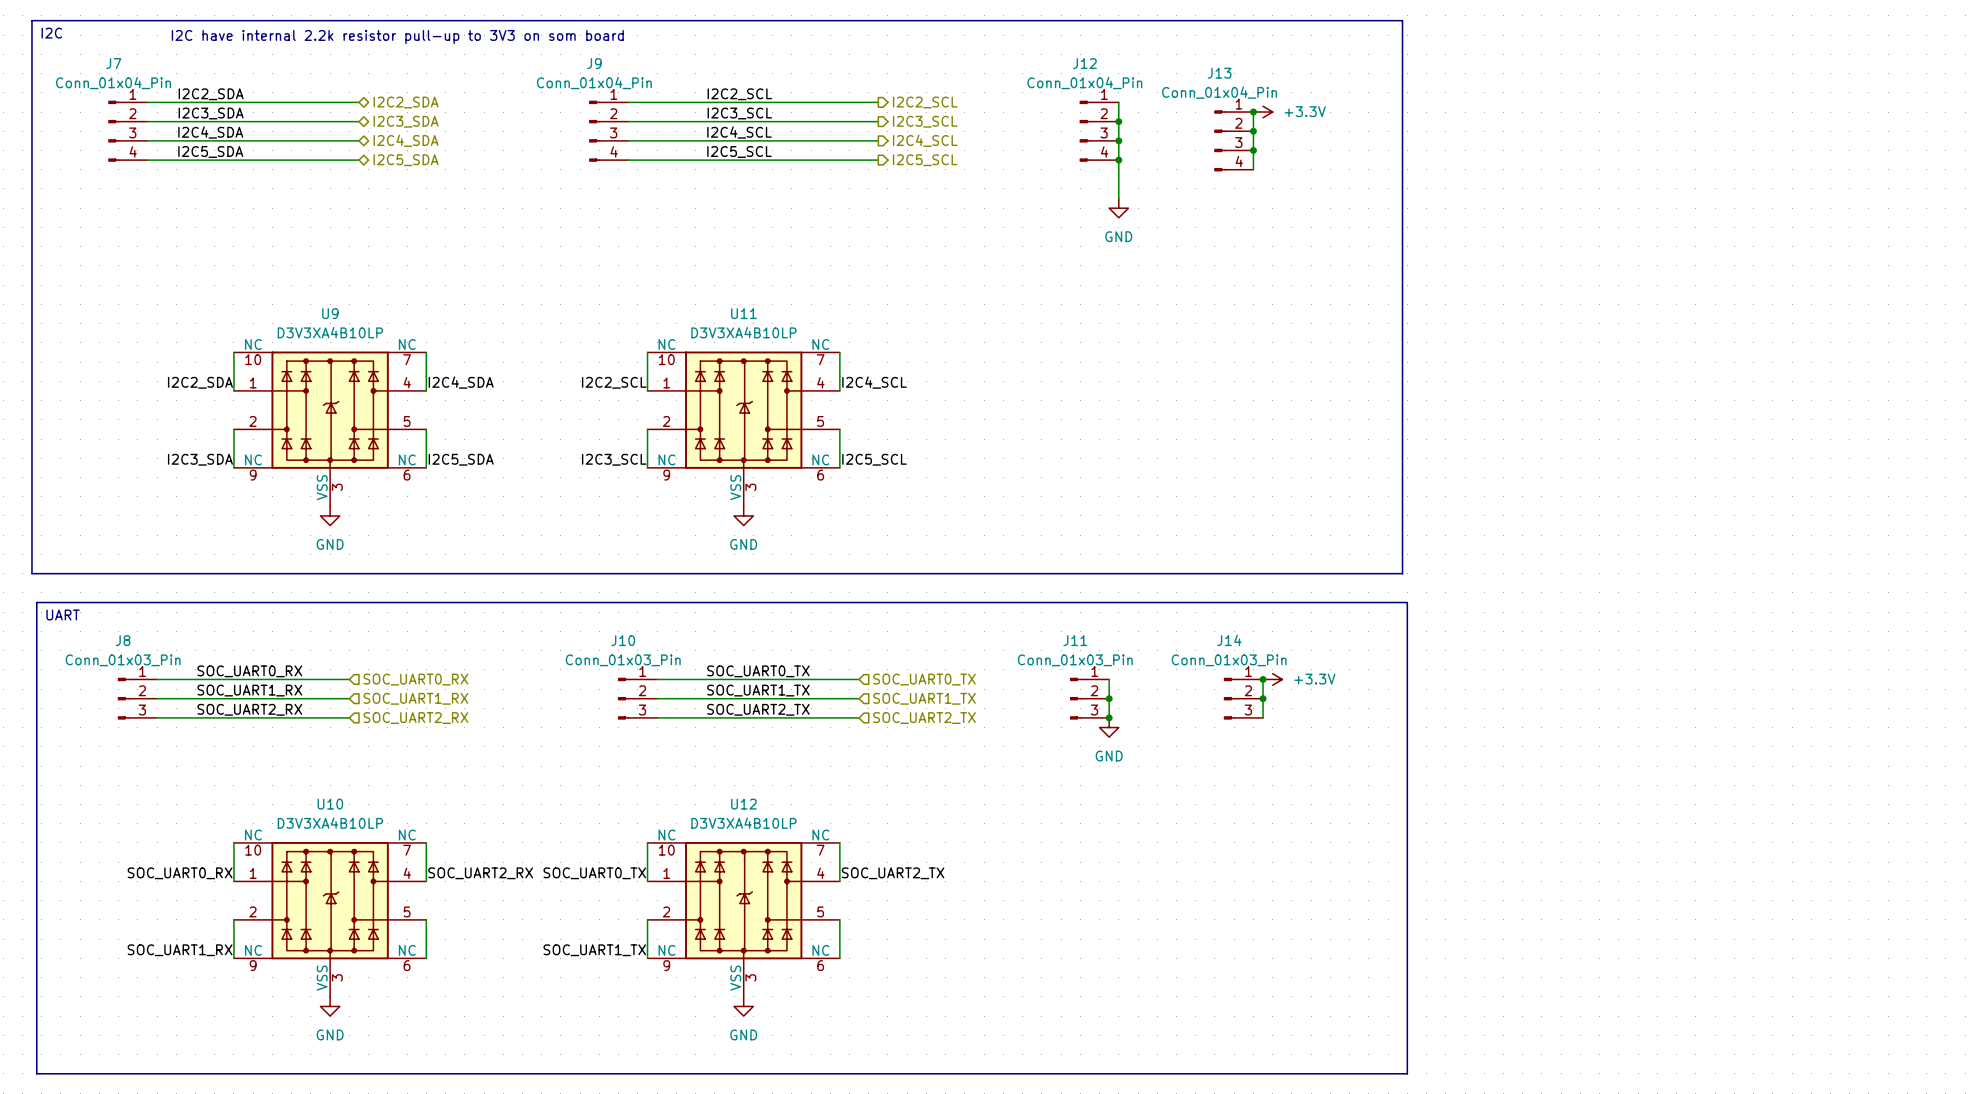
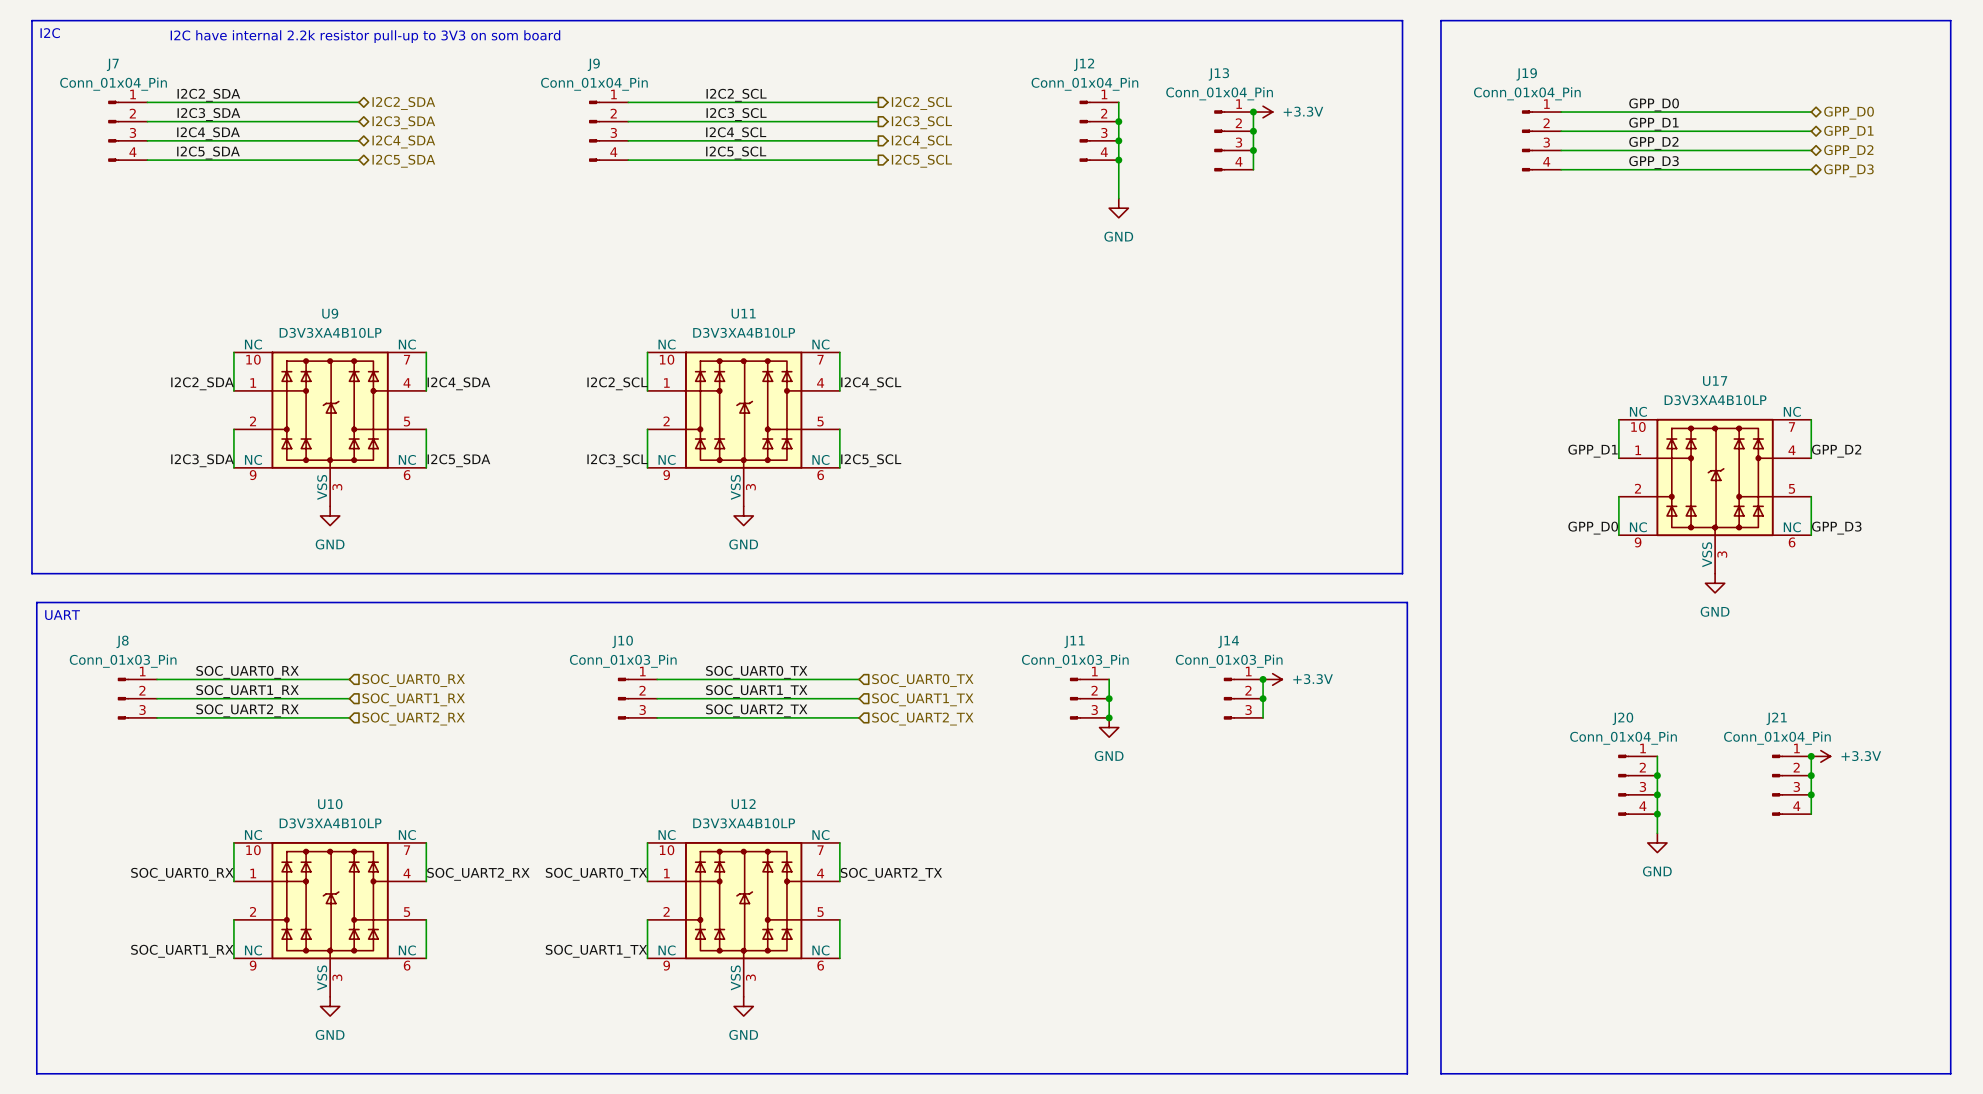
line: none -> (1440, 20) (1950, 20) (1950, 1073) (1440, 1073) (1440, 20)
label: none -> GPP_D0 (1654, 104)
wire: none -> (1561, 112) (1811, 112)
hierarchical label: none -> GPP_D0 (1849, 113)
label: none -> GPP_D1 (1653, 124)
wire: none -> (1561, 131) (1811, 131)
hierarchical label: none -> GPP_D1 (1848, 132)
J19: none -> Conn_01x04_Pin (1541, 140)
label: none -> GPP_D2 (1653, 143)
wire: none -> (1561, 150) (1811, 150)
hierarchical label: none -> GPP_D2 (1848, 151)
label: none -> GPP_D3 (1654, 162)
wire: none -> (1561, 169) (1811, 169)
hierarchical label: none -> GPP_D3 (1848, 170)
wire: none -> (1618, 419) (1618, 458)
wire: none -> (1811, 419) (1811, 458)
label: none -> GPP_D1 (1593, 451)
label: none -> GPP_D2 (1836, 451)
wire: none -> (1618, 496) (1618, 535)
U17: none -> D3V3XA4B10LP (1715, 496)
wire: none -> (1811, 496) (1811, 535)
label: none -> GPP_D0 (1593, 528)
label: none -> GPP_D3 (1836, 528)
power symbol: none -> GND (1715, 583)
wire: none -> (1657, 756) (1657, 833)
wire: none -> (1811, 756) (1811, 814)
junction: none -> (1811, 756)
power symbol: none -> +3.3V (1820, 756)
junction: none -> (1657, 775)
junction: none -> (1811, 775)
J20: none -> Conn_01x04_Pin (1637, 785)
J21: none -> Conn_01x04_Pin (1791, 785)
junction: none -> (1657, 794)
junction: none -> (1811, 794)
junction: none -> (1657, 814)
power symbol: none -> GND (1657, 842)

